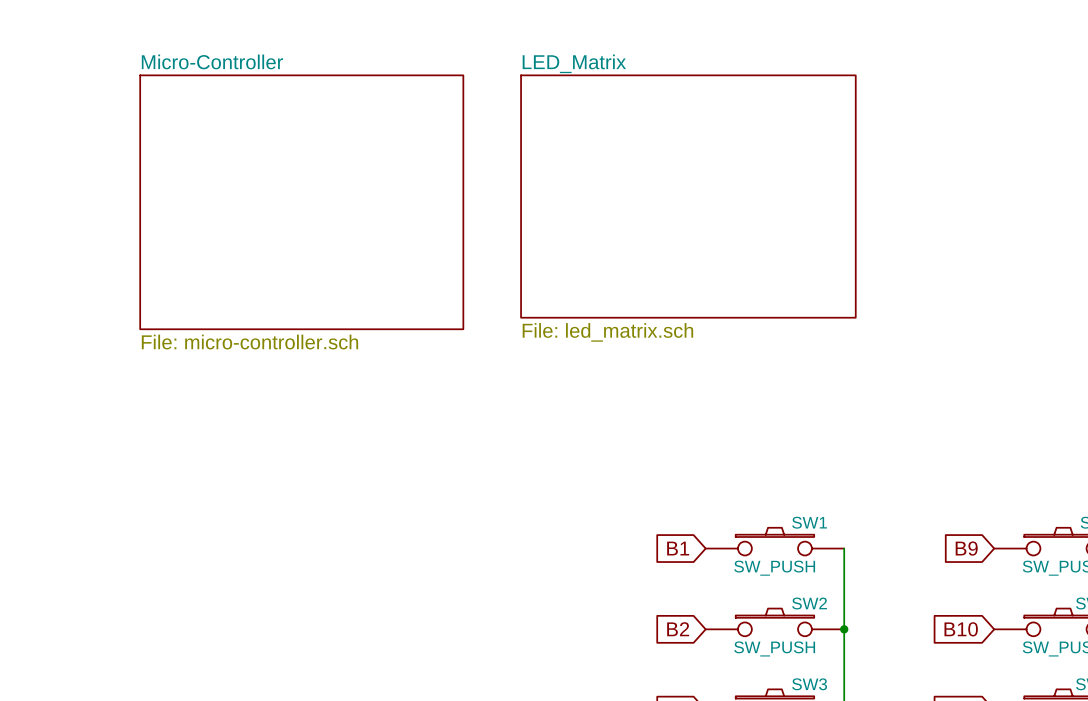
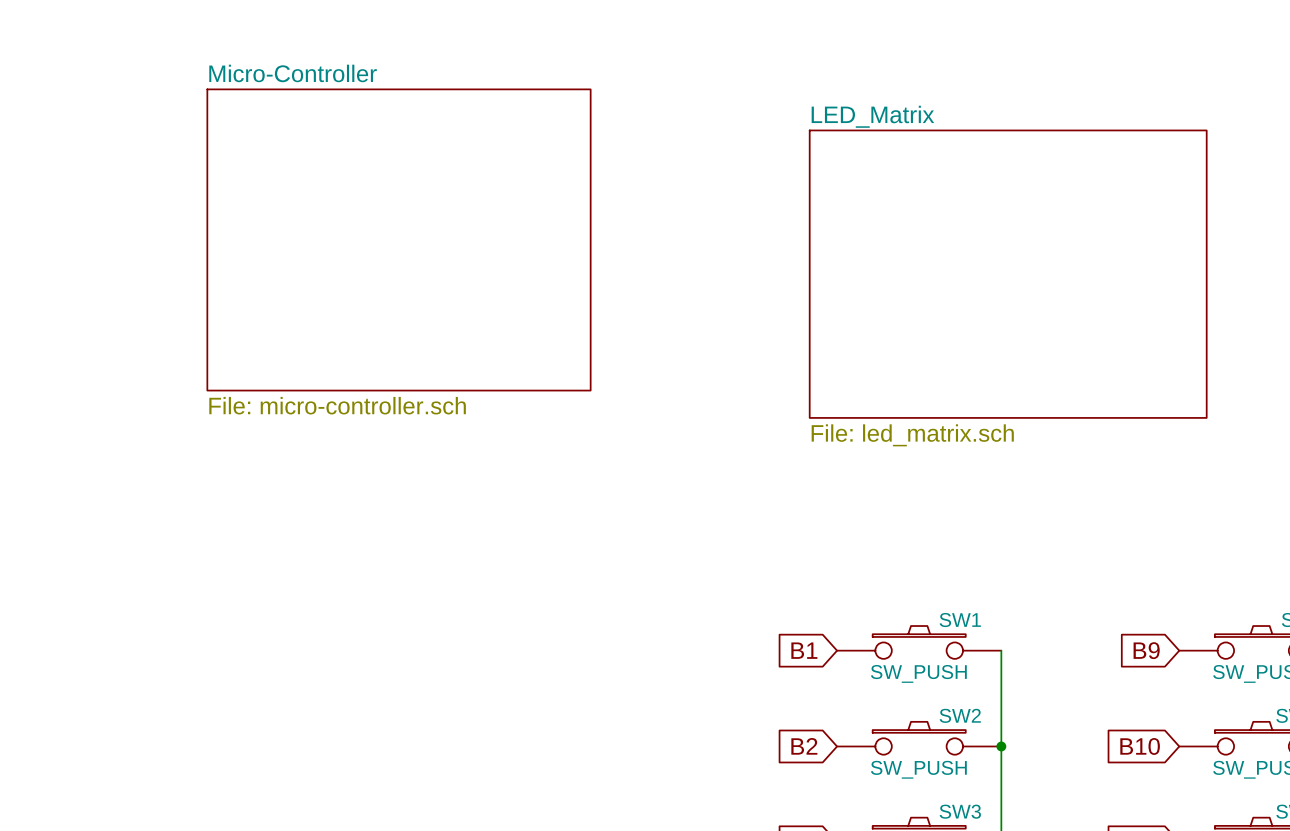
sheet LED_Matrix position: (688, 196) -> (1008, 274)
sheet Micro-Controller position: (301, 202) -> (399, 239)

